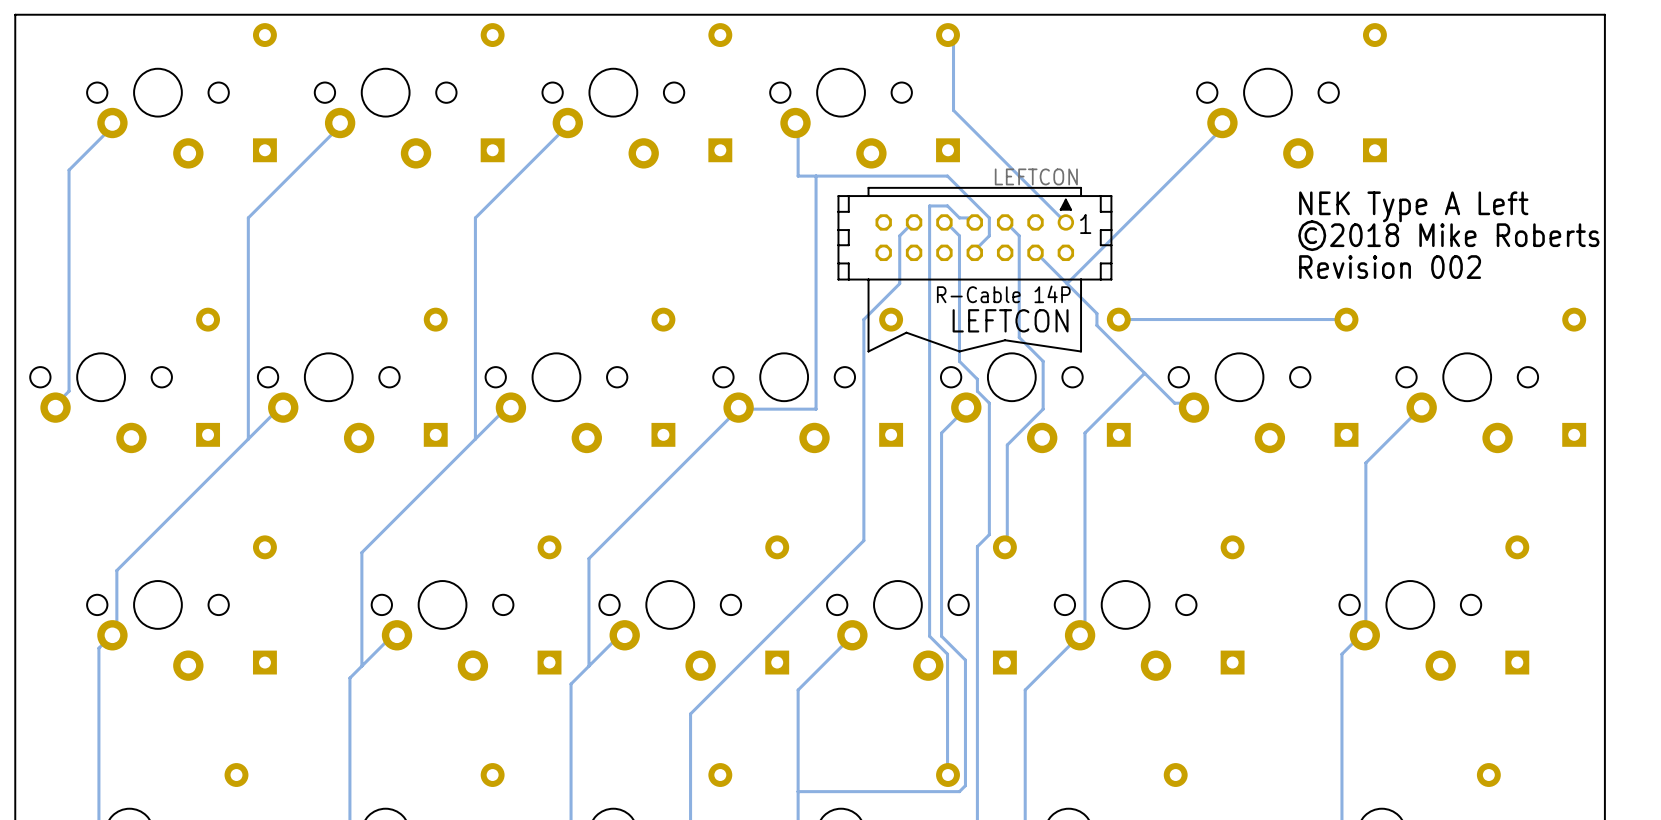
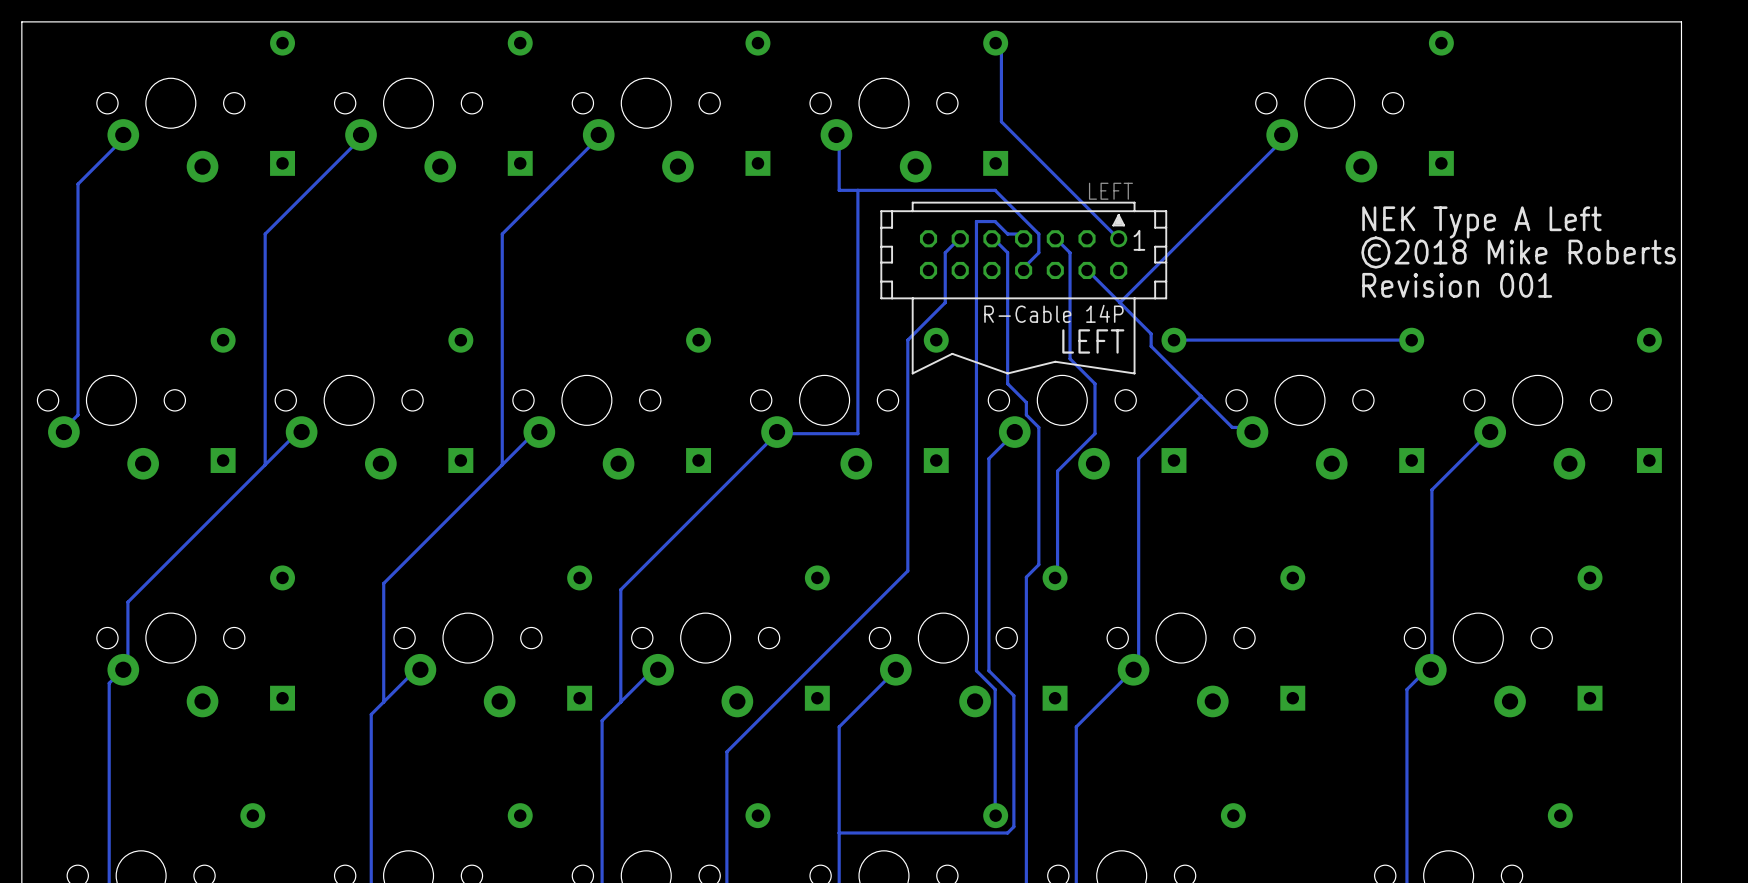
LEFTCON value: LEFTCON (1036, 176) -> LEFT (1110, 191)
text: Revision 002 (1390, 267) -> Revision 001 (1457, 285)
LEFTCON name: LEFTCON (1010, 320) -> LEFT (1093, 341)

